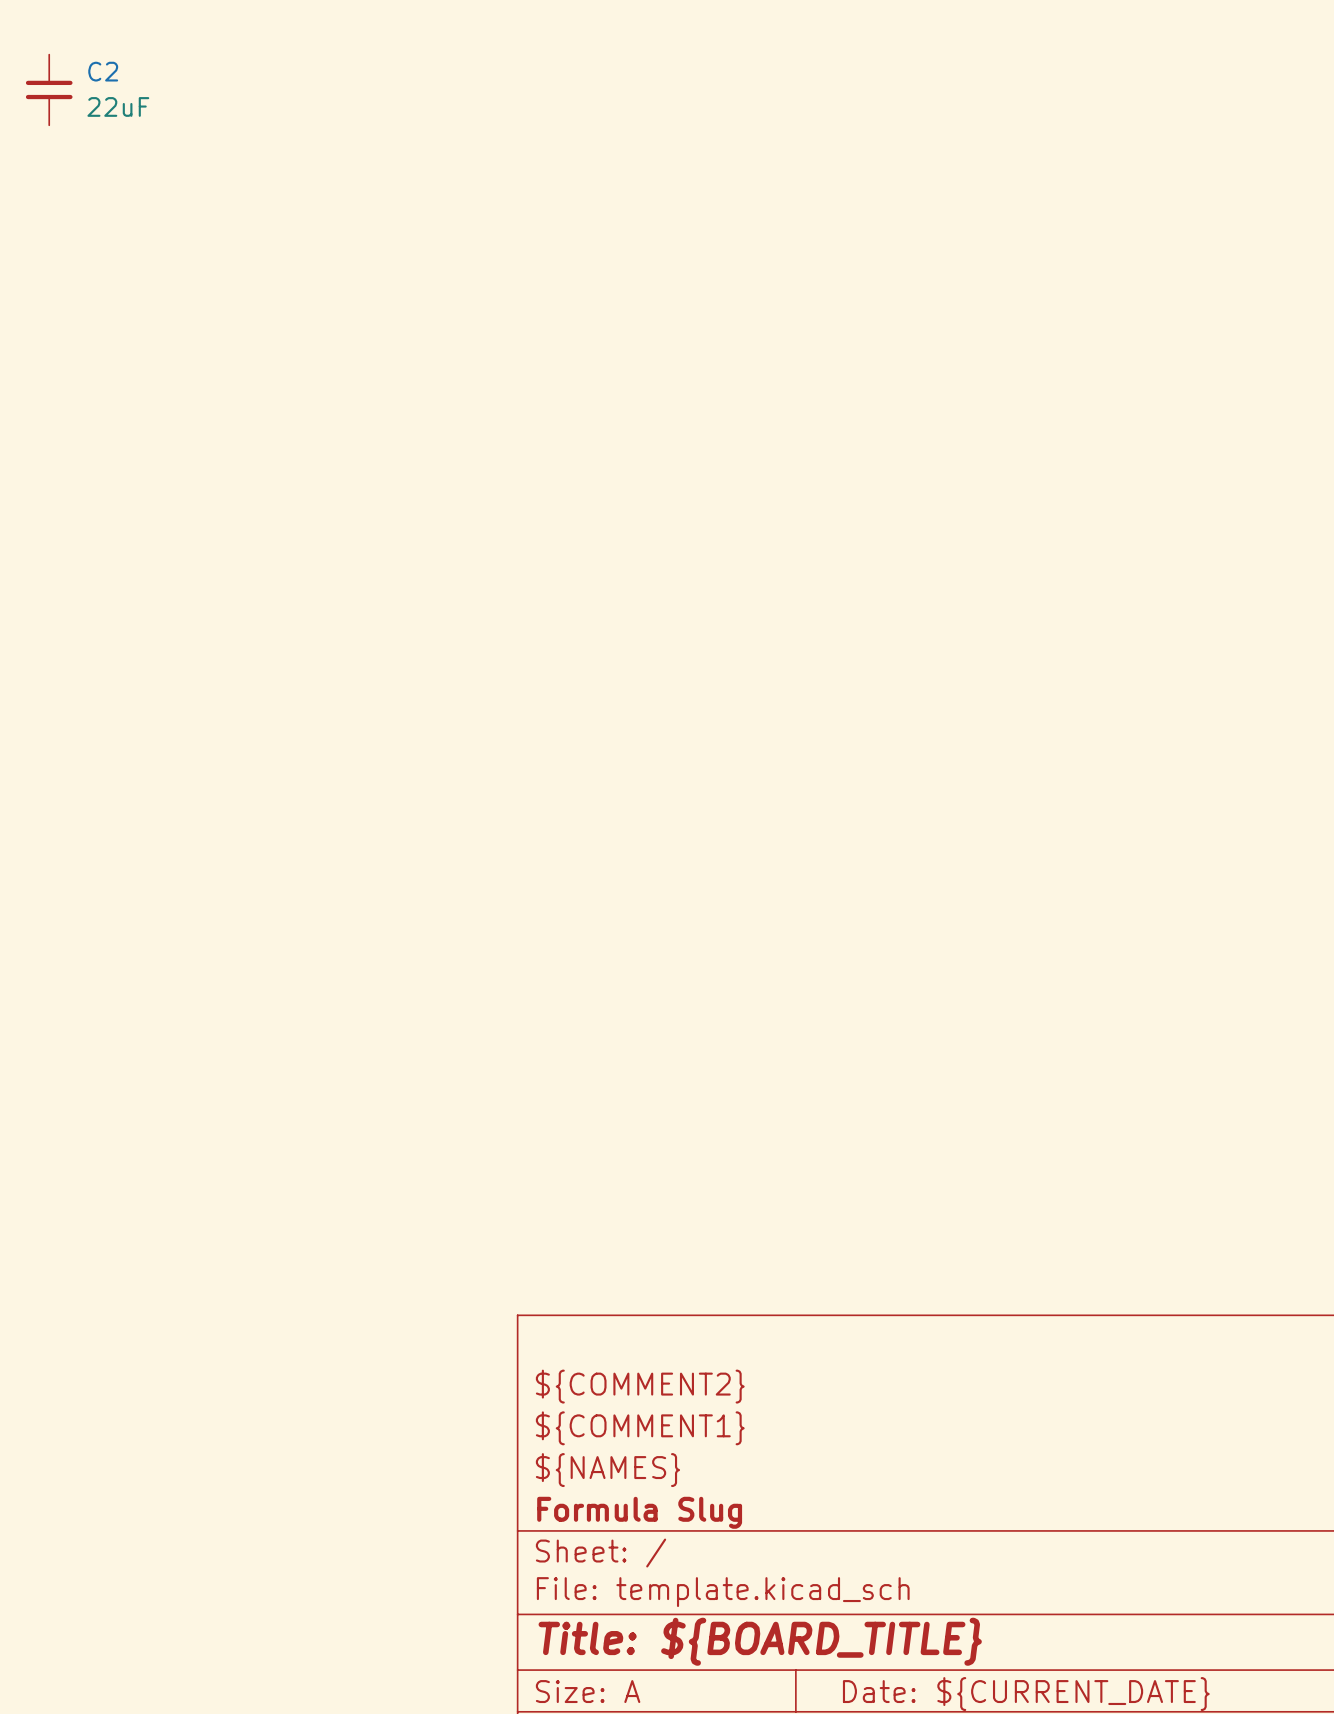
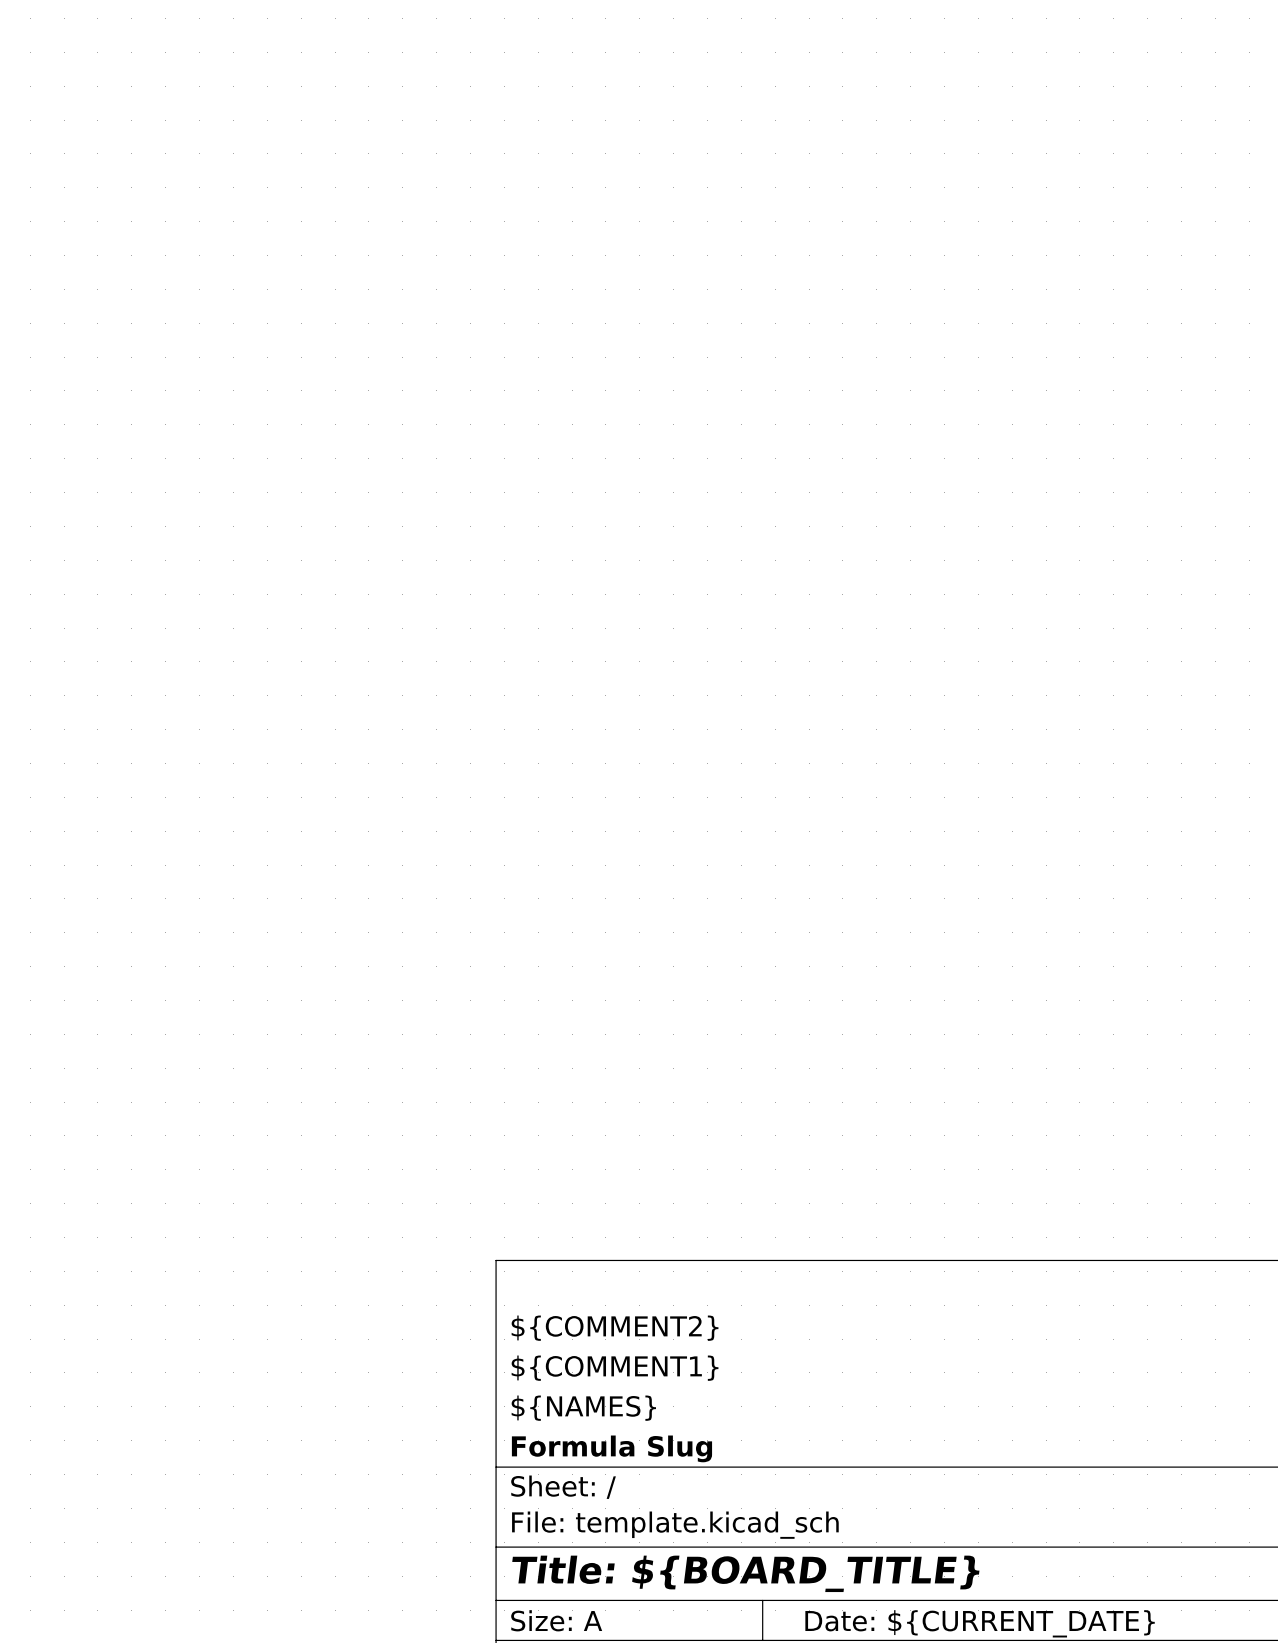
C2: 22uF (49, 89) -> none

